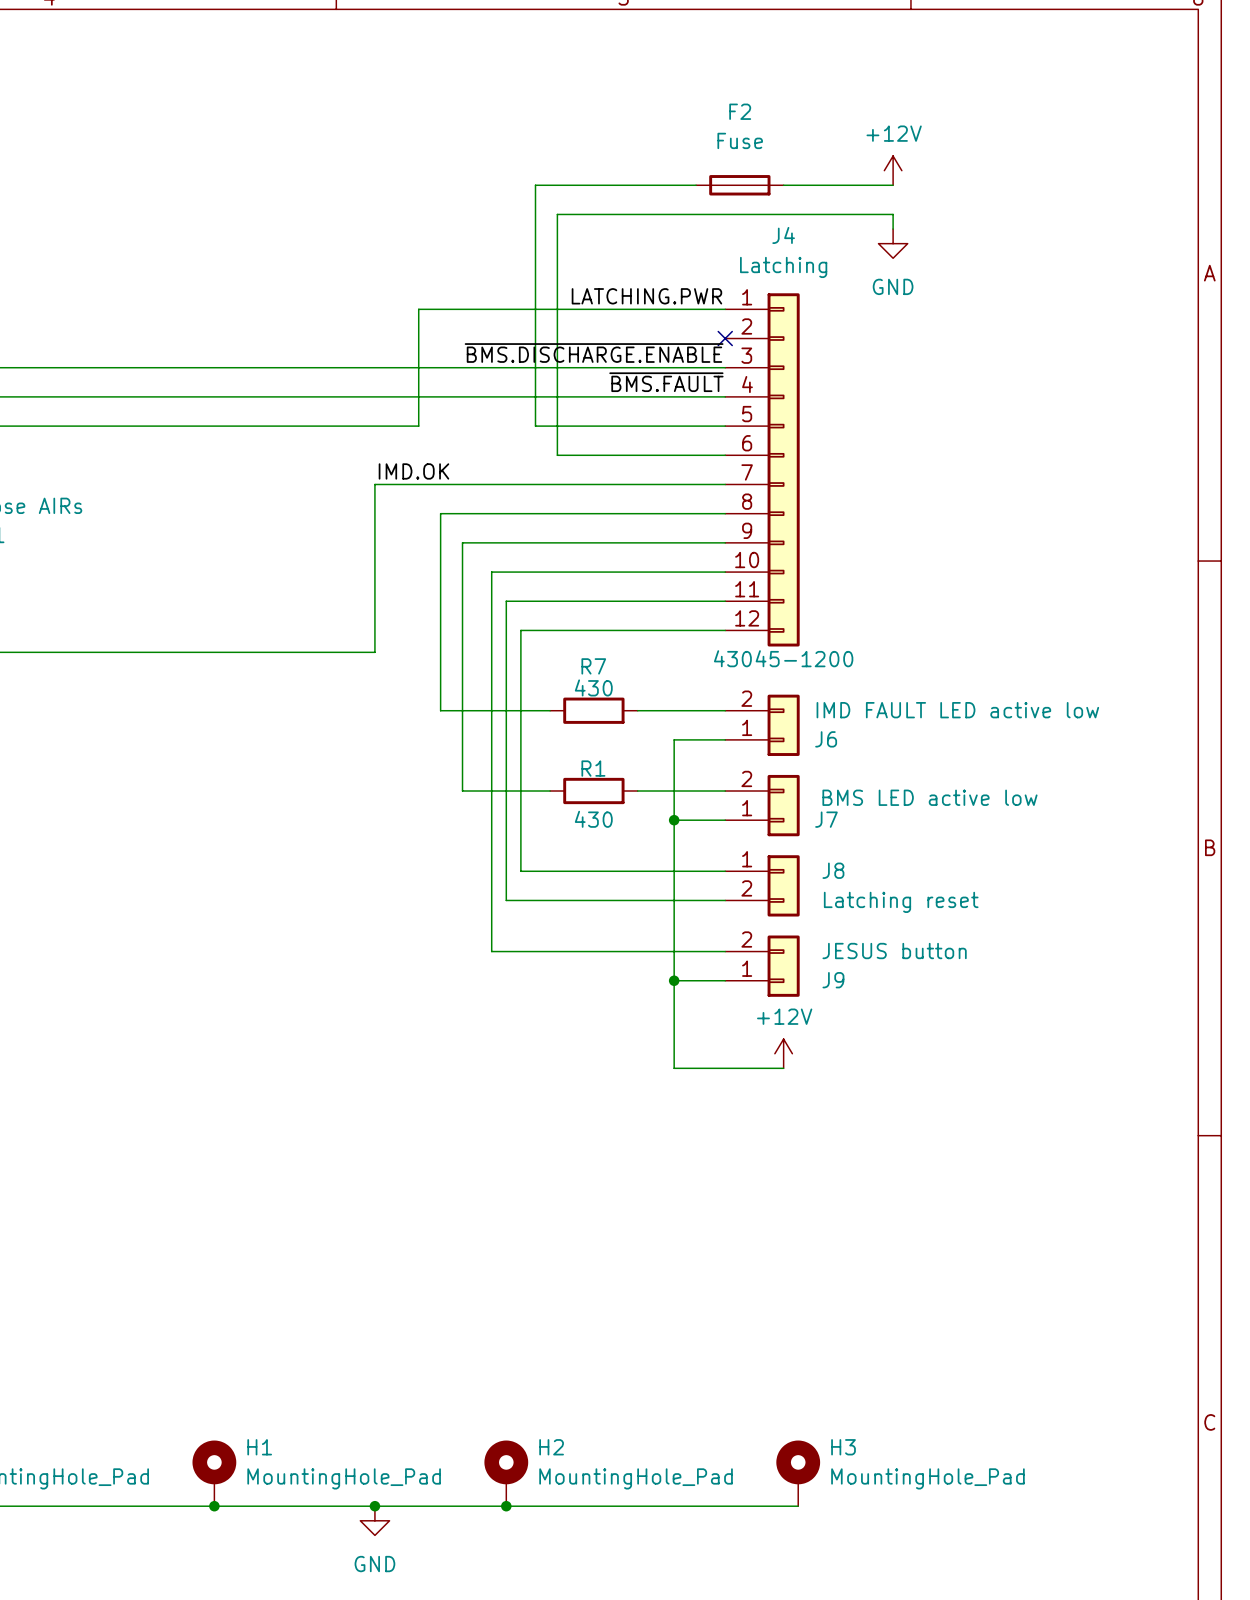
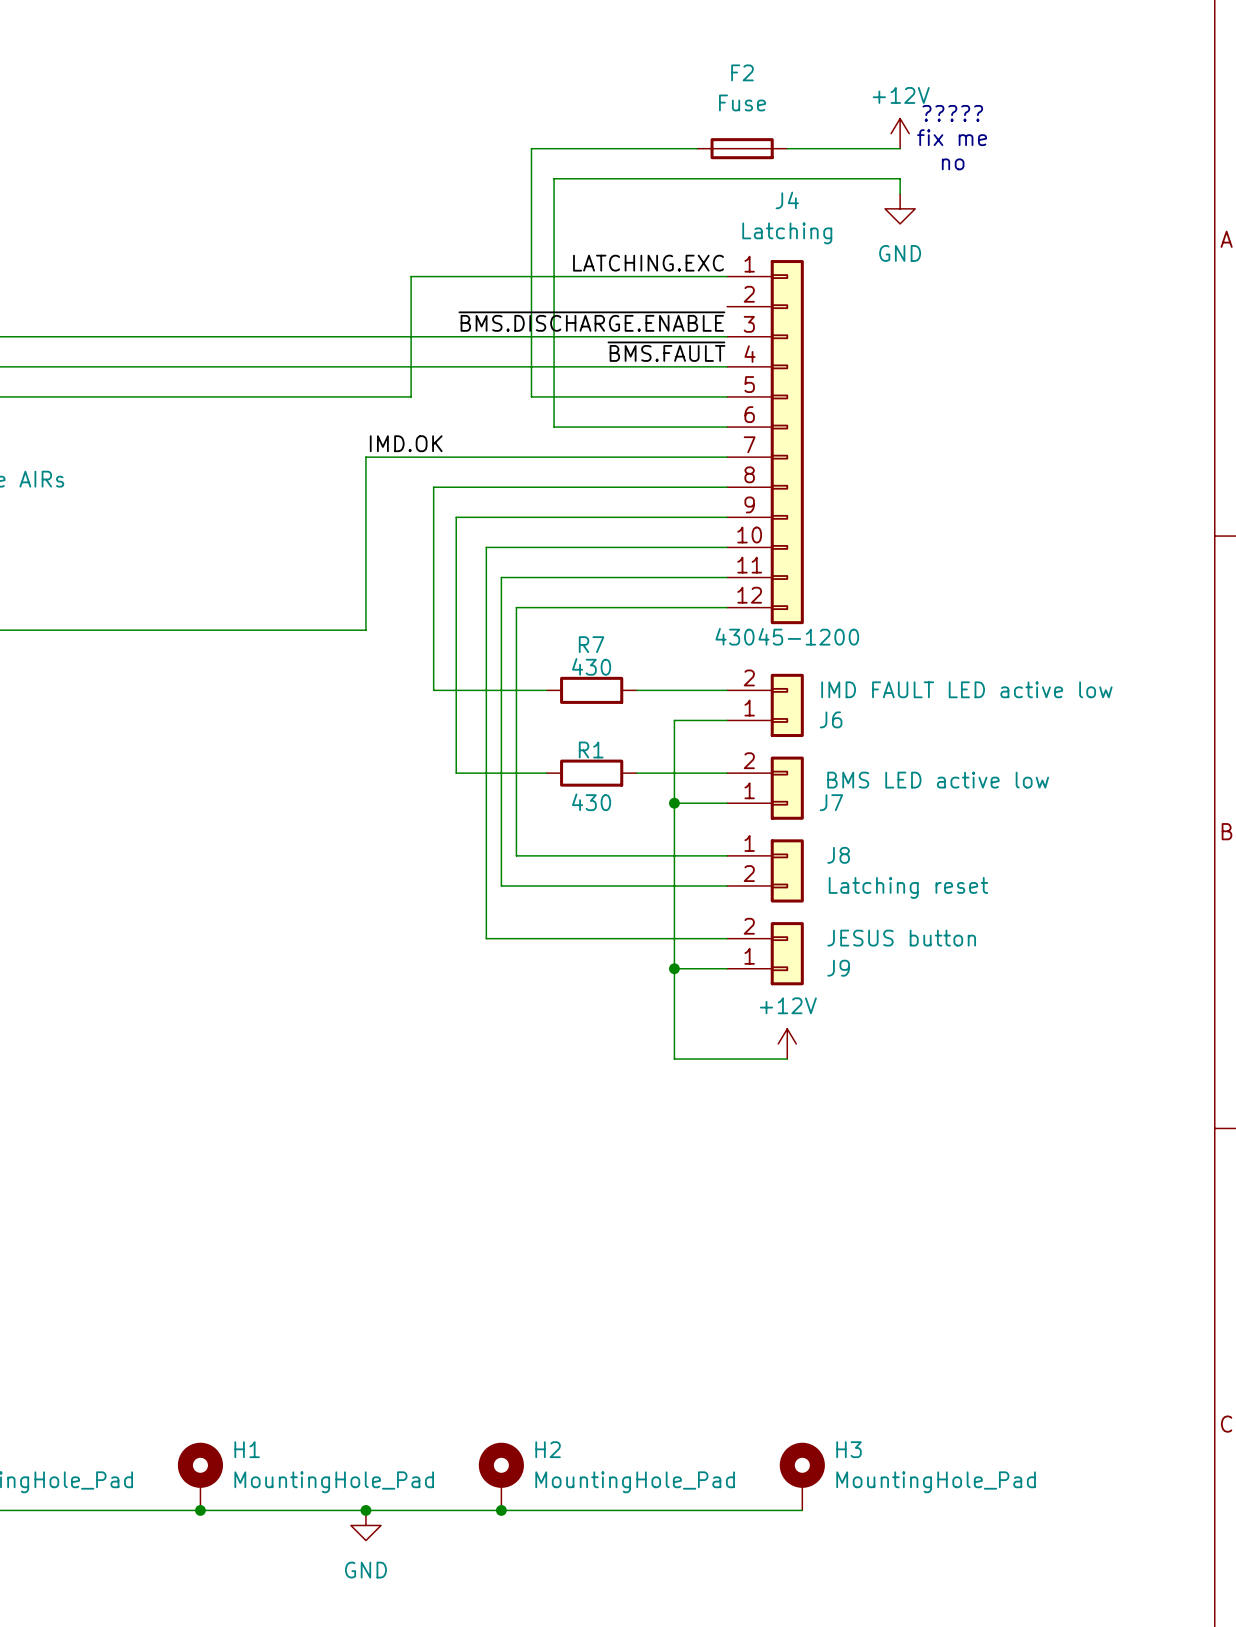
text: none -> ????? (952, 113)
text: none -> fix me (952, 137)
text: none -> no (953, 164)
label: LATCHING.PWR (646, 296) -> LATCHING.EXC (648, 263)
no-connect mark: (725, 338) -> none

